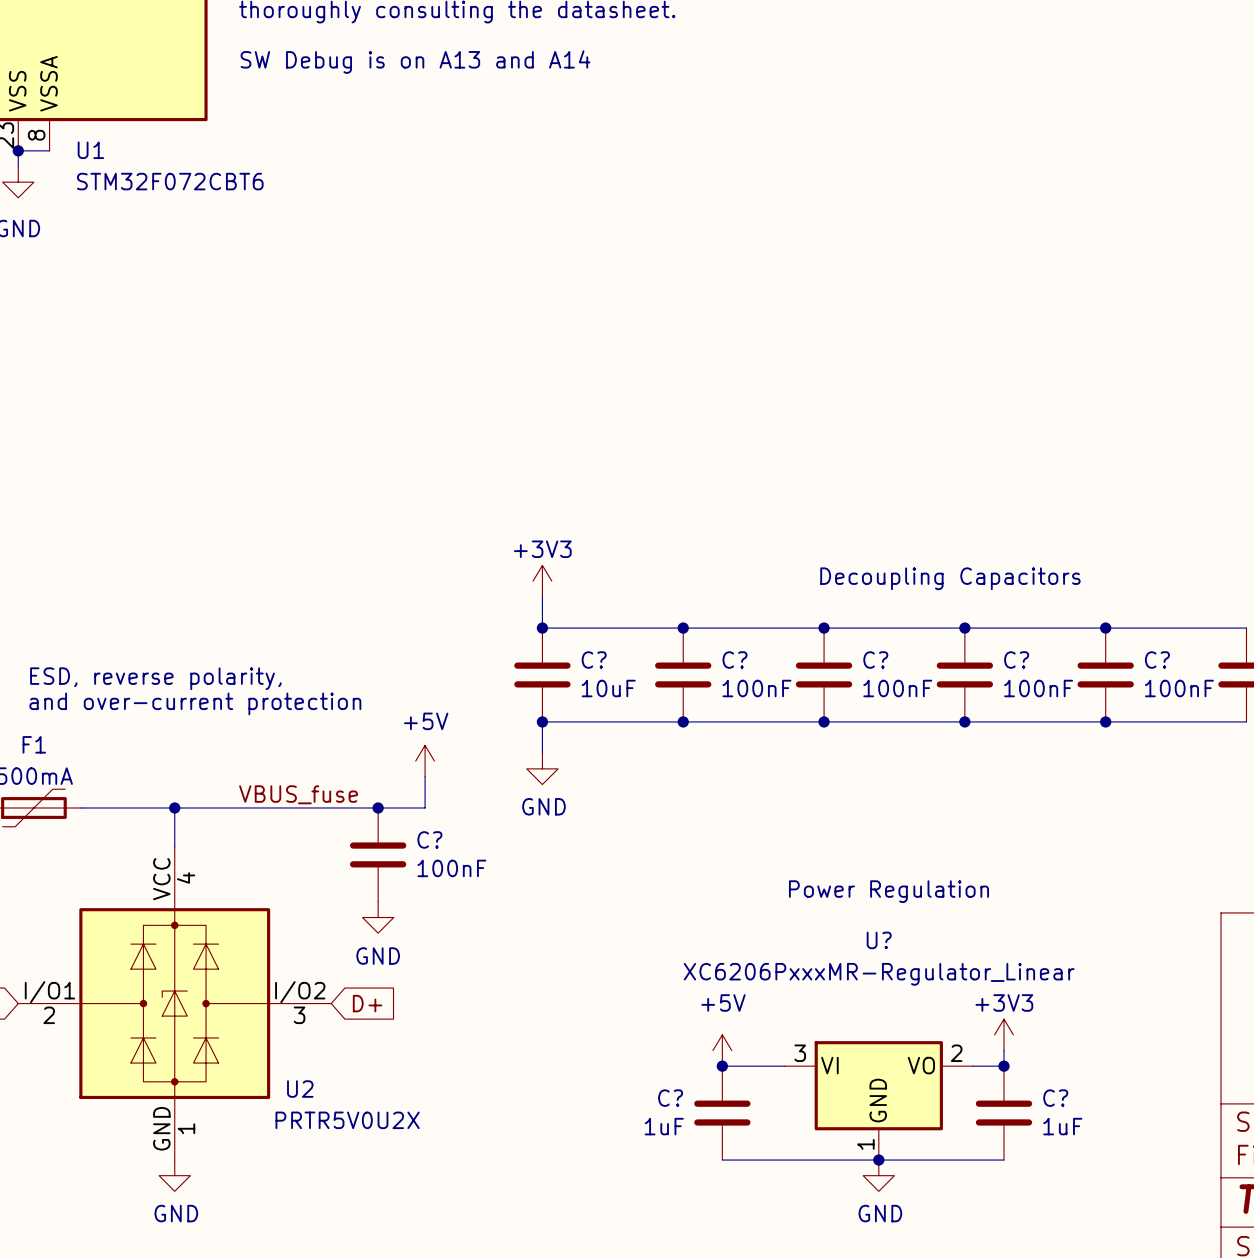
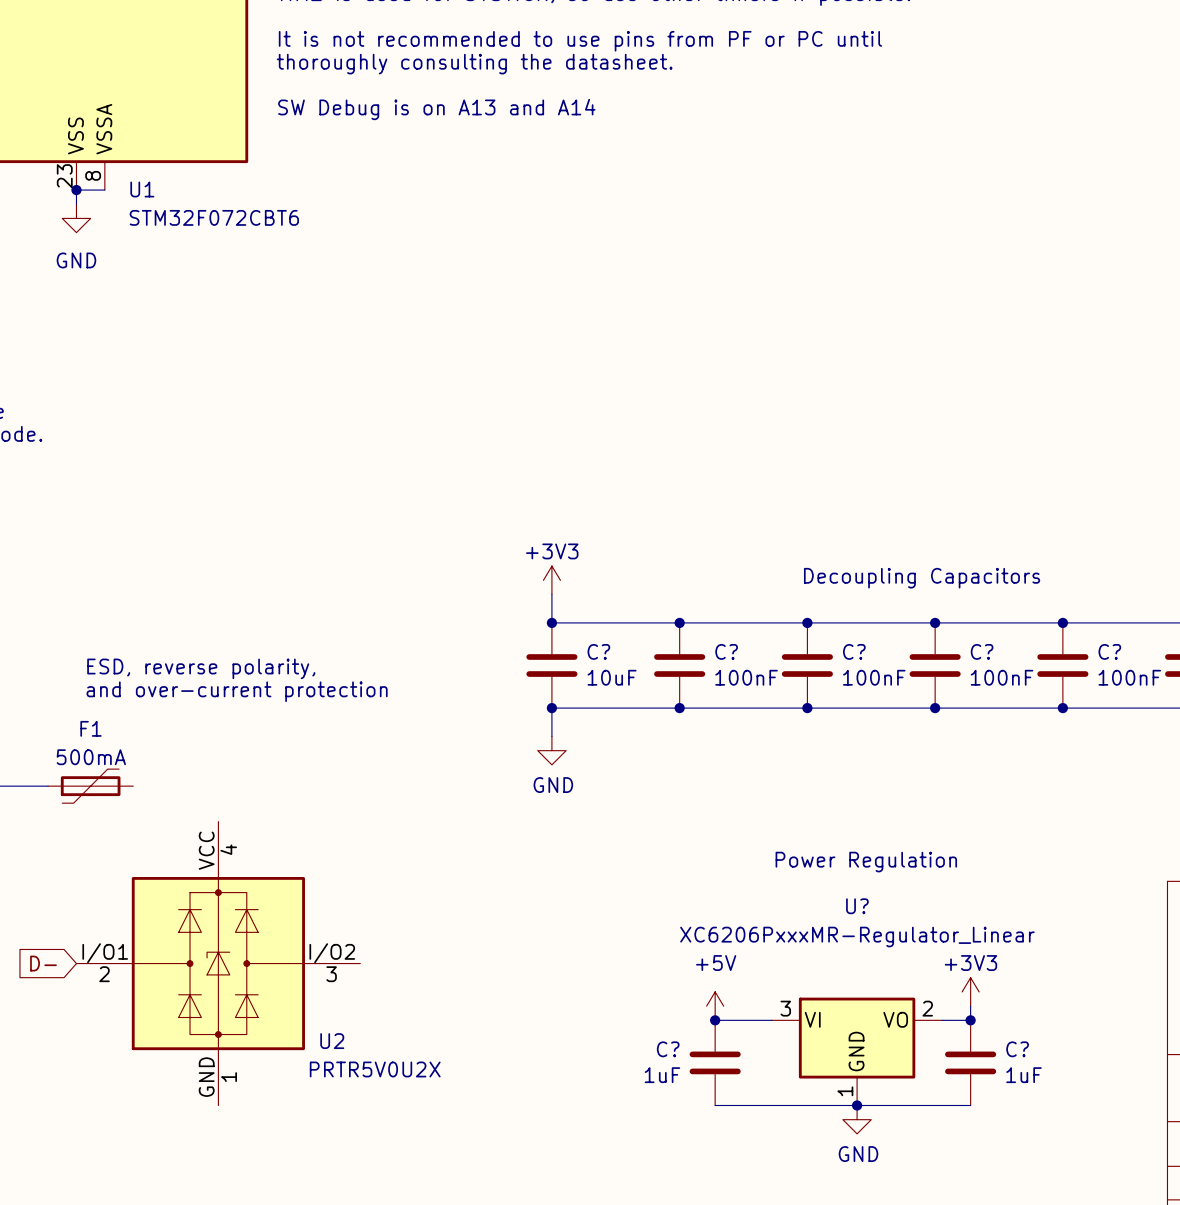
power symbol: +5V (425, 761) -> none
wire: (425, 776) (425, 808) (80, 808) -> none
label: VBUS_fuse (298, 794) -> none
wire: (174, 808) (174, 847) -> none
junction: (174, 808) -> none
junction: (378, 808) -> none
C?: 100nF (378, 854) -> none
power symbol: GND (378, 917) -> none
global label: D+ (367, 1003) -> none
power symbol: GND (174, 1175) -> none

